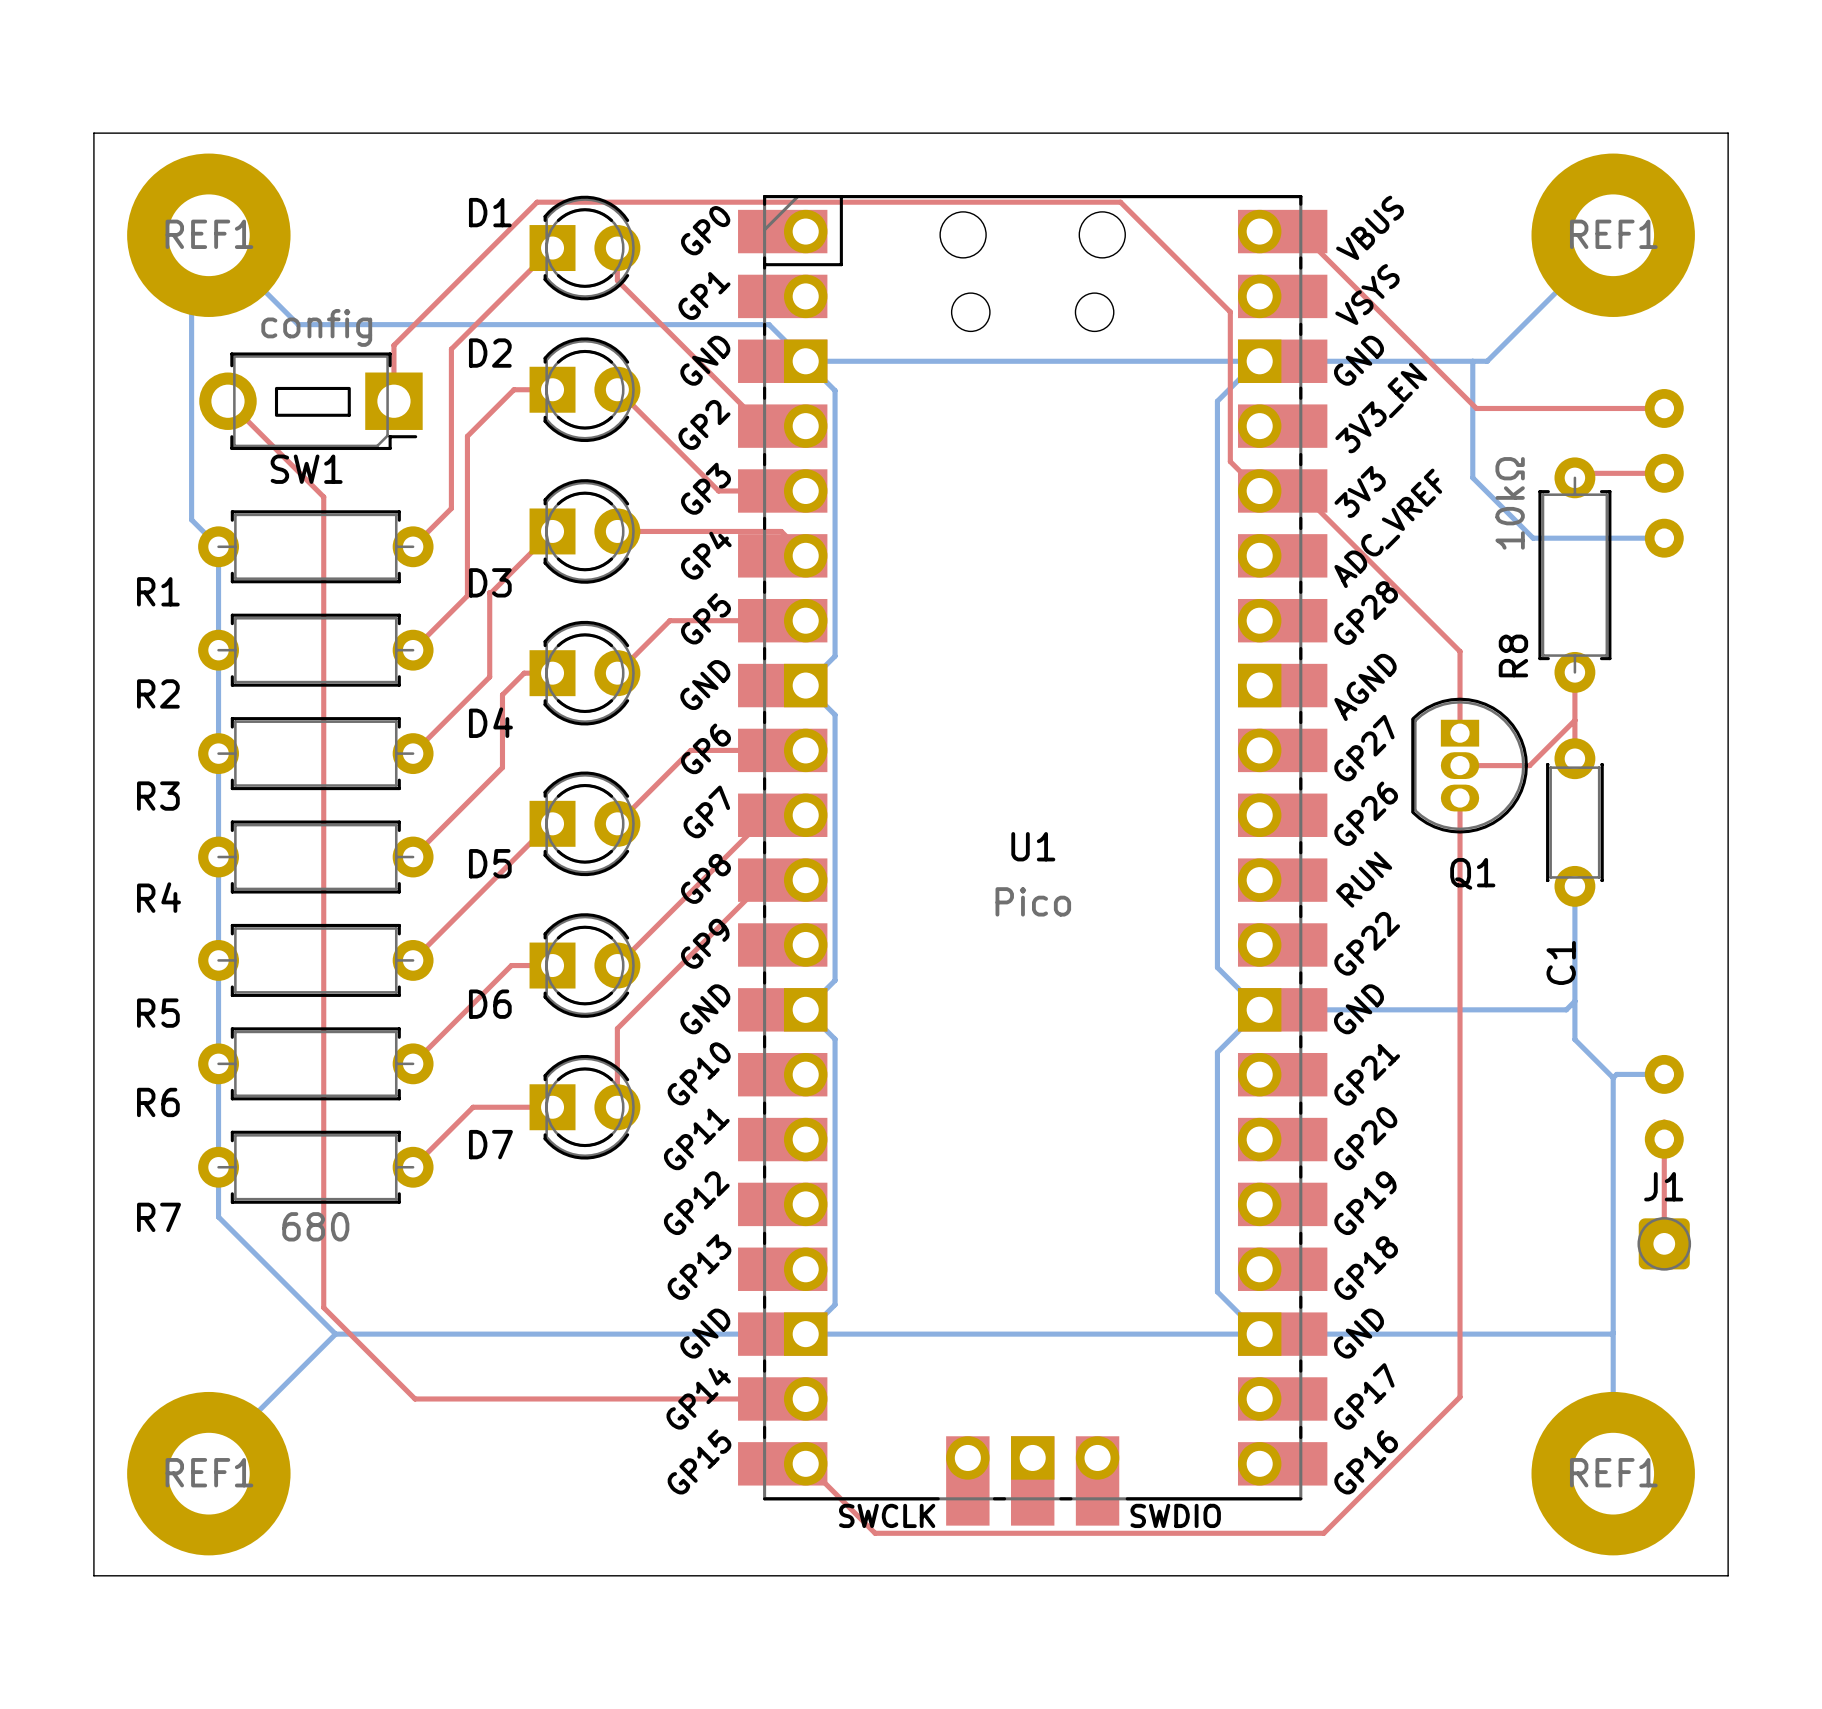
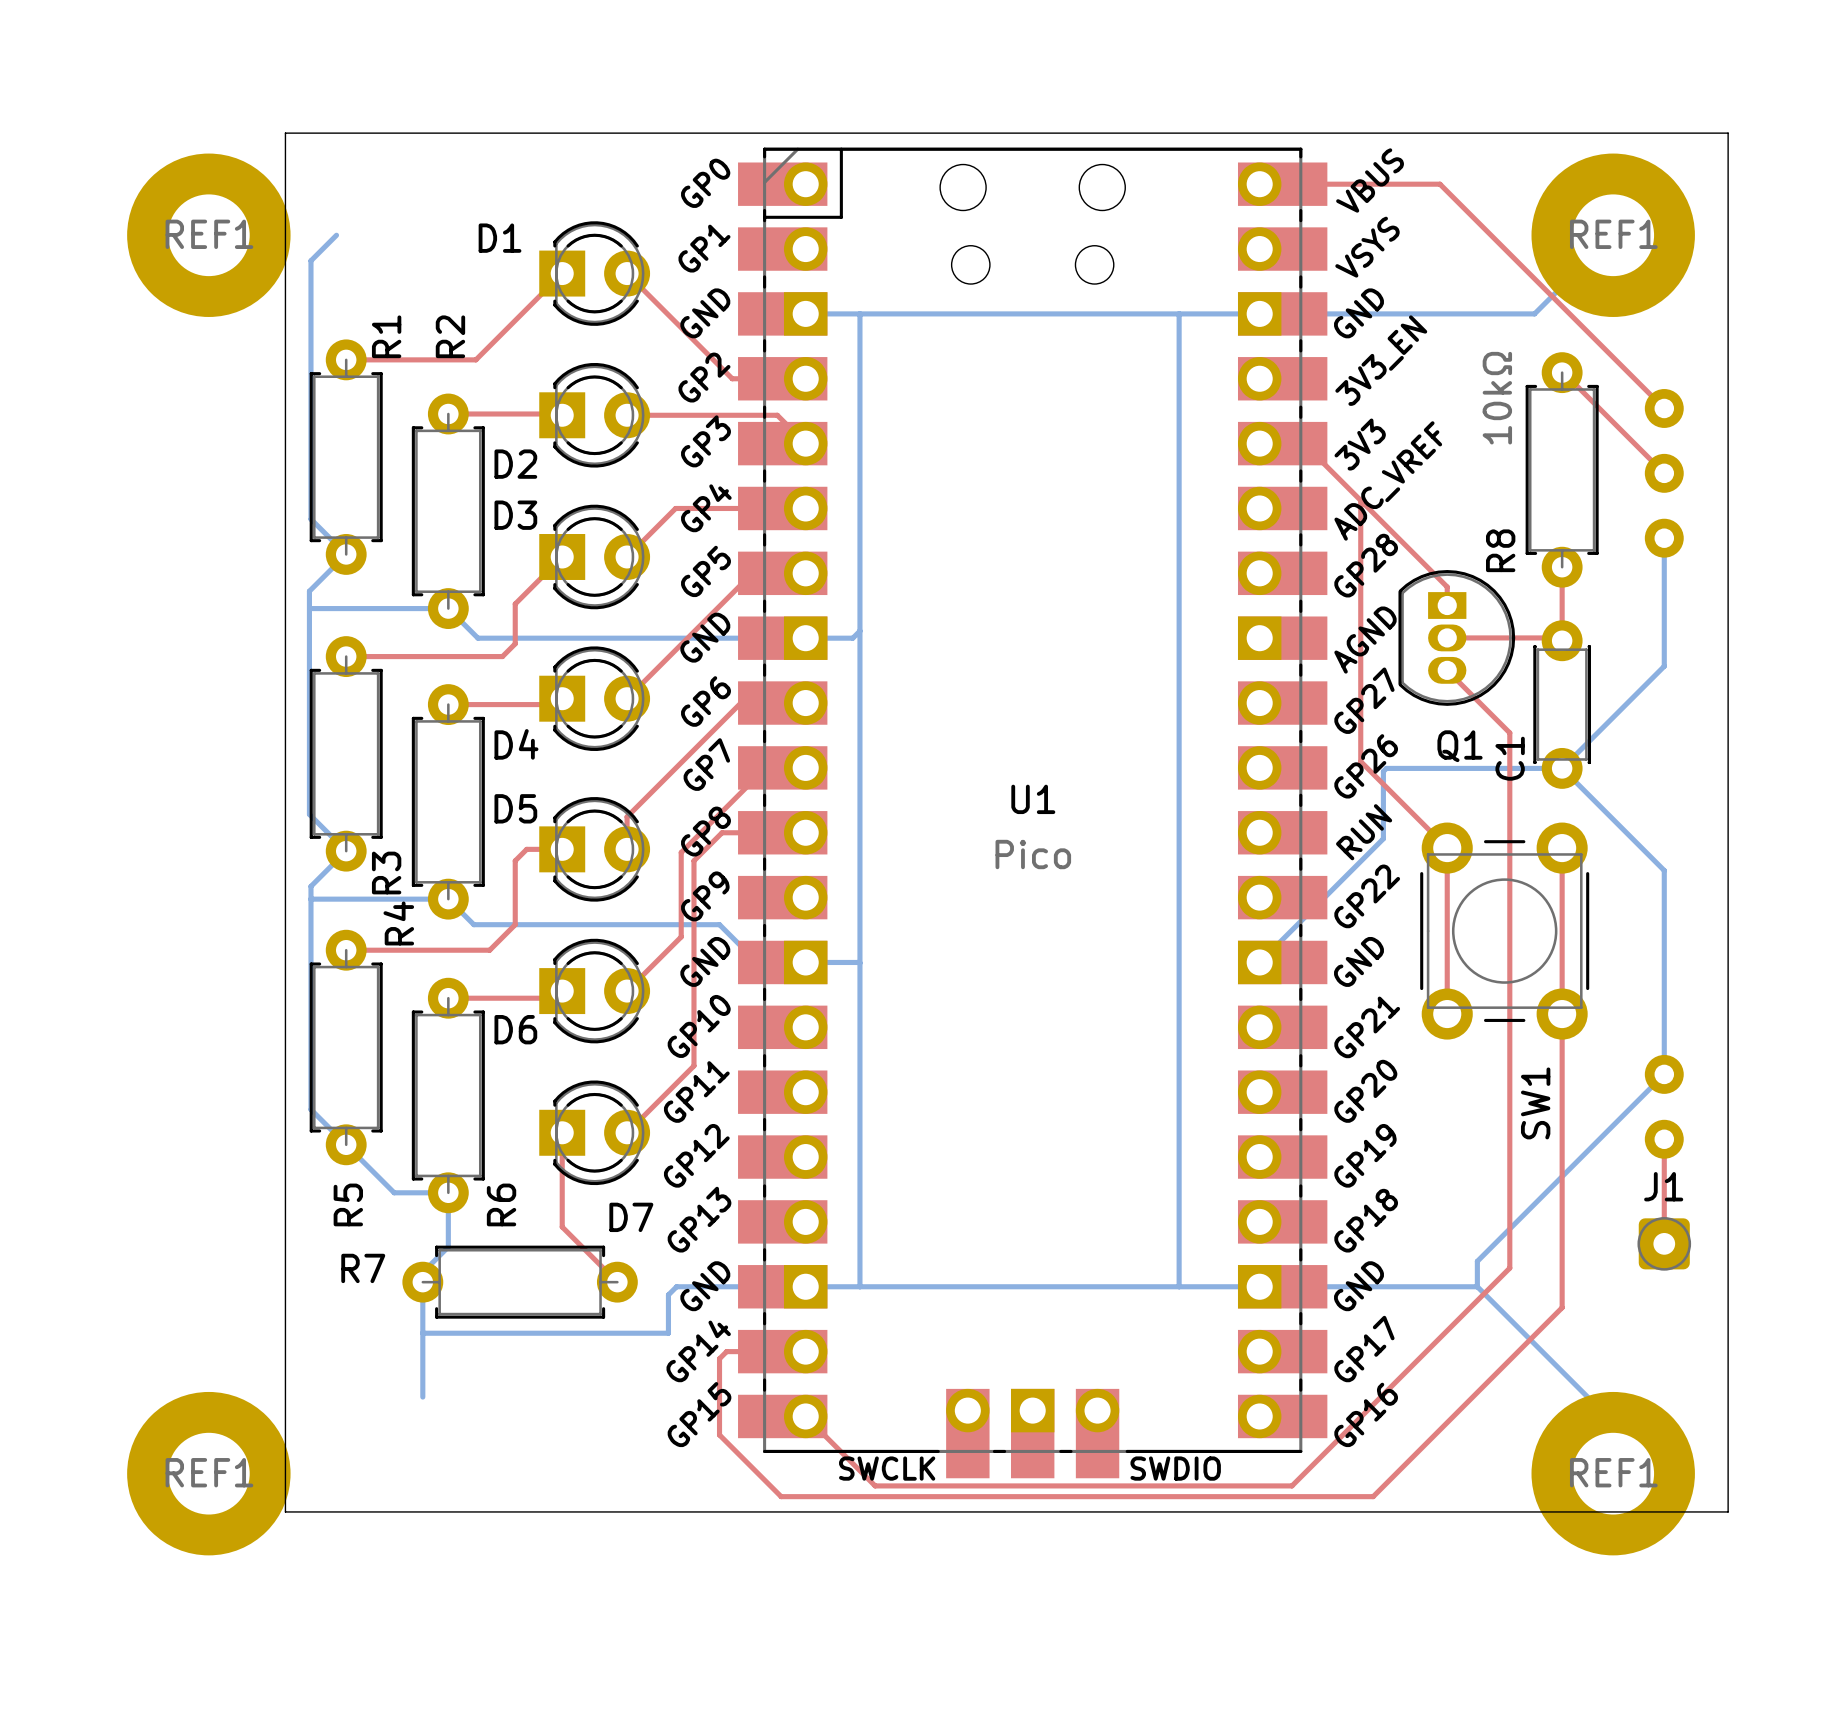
board edge: (285, 133) (93, 133) (93, 1575) (1728, 1575) (1728, 1511) -> (285, 133) (285, 1511) (1728, 1511)
top track: (1299, 231) (1476, 408) (1664, 408) -> (1259, 184) (1439, 184) (1664, 408)
bottom track: (208, 235) (298, 324) (769, 324) (835, 390) (835, 656) (805, 685) (835, 714) (835, 980) (805, 1009) (835, 1039) (835, 1304) (805, 1334) -> none
bottom track: none -> (336, 235) (310, 260) (310, 519) (346, 554) (309, 591) (309, 814) (346, 851) (310, 886) (310, 1109) (394, 1192) (448, 1192) (448, 1246) (422, 1272)
top track: (552, 248) (451, 349) (451, 508) (413, 546) -> none
D1 position: (584, 248) -> (594, 273)
top track: (617, 248) (617, 280) (762, 426) -> none
bottom track: (191, 252) (191, 519) (218, 546) (218, 1217) (335, 1334) -> none
top track: none -> (562, 273) (475, 359) (346, 359)
top track: none -> (627, 273) (732, 378) (805, 378)
bottom track: none -> (859, 313) (859, 1286)
bottom track: none -> (1179, 313) (1179, 1286)
bottom track: (1534, 313) (1487, 361) (805, 361) -> (1534, 313) (805, 313)
SW1 value: config (316, 327) -> none
SW1 footprint: [199, 352, 423, 451] -> [1420, 822, 1590, 1040]
D2 name position: D2 (490, 353) -> D2 (515, 464)
bottom track: (1257, 361) (1217, 401) (1217, 967) (1259, 1009) (1566, 1009) (1574, 1001) -> none
bottom track: (1472, 361) (1472, 477) (1533, 538) (1664, 538) -> (1562, 768) (1664, 666) (1664, 538)
top track: (552, 389) (513, 389) (467, 436) (467, 595) (413, 650) -> none
D2 position: (584, 389) -> (594, 415)
top track: (617, 389) (718, 490) (805, 490) -> none
top track: (227, 401) (323, 496) (323, 1307) (415, 1398) (805, 1398) -> none
top track: (393, 401) (393, 345) (537, 202) (1120, 202) (1230, 311) (1230, 461) (1259, 490) -> none
top track: none -> (448, 414) (560, 414)
top track: none -> (627, 415) (777, 415) (805, 443)
top track: none -> (1303, 443) (1447, 586) (1447, 605)
SW1 name position: SW1 (306, 469) -> SW1 (1535, 1103)
top track: (1579, 473) (1664, 473) -> (1563, 372) (1664, 473)
top track: (1299, 490) (1460, 651) (1460, 733) -> none
top track: none -> (1360, 500) (1360, 761) (1447, 848) (1447, 1014)
top track: none -> (805, 508) (675, 508) (627, 556)
top track: (552, 531) (489, 592) (489, 677) (413, 753) -> none
D3 position: (584, 531) -> (594, 556)
top track: (617, 531) (781, 531) (805, 555) -> none
R1 rotation: 0° (315, 546) -> 90° clockwise (346, 457)
top track: none -> (562, 556) (515, 603) (515, 643) (502, 656) (346, 656)
top track: none -> (1562, 567) (1562, 640)
top track: none -> (752, 573) (627, 698)
R8 position: (1574, 575) -> (1562, 469)
D3 name position: D3 (490, 582) -> D3 (515, 515)
R1 name position: R1 (158, 591) -> R1 (386, 336)
bottom track: none -> (310, 608) (448, 608) (477, 638) (852, 638) (859, 631)
top track: (805, 620) (669, 620) (617, 673) -> none
top track: none -> (1447, 637) (1549, 637)
R2 rotation: 0° (315, 650) -> 90° clockwise (448, 511)
R2 position: (315, 650) -> (448, 511)
top track: none -> (1447, 670) (1509, 732) (1509, 1268) (1291, 1485) (875, 1485) (805, 1416)
top track: (1574, 672) (1574, 758) -> none
top track: (552, 673) (524, 673) (502, 694) (502, 767) (413, 857) -> none
D4 position: (584, 673) -> (594, 698)
top track: none -> (740, 703) (627, 816) (627, 849)
top track: none -> (448, 704) (556, 704)
top track: (1574, 720) (1529, 765) (1460, 765) -> none
D4 name position: D4 (490, 722) -> D4 (516, 744)
top track: (805, 750) (690, 750) (617, 823) -> none
R3 rotation: 0° (315, 753) -> 90° clockwise (346, 753)
Q1 position: (1469, 765) -> (1456, 637)
top track: none -> (765, 767) (681, 852) (681, 936) (627, 991)
bottom track: none -> (1562, 768) (1664, 870) (1664, 1074) (1477, 1261) (1477, 1286)
bottom track: none -> (1562, 768) (1386, 768) (1383, 771) (1383, 838) (1259, 962)
R3 name position: R3 (158, 796) -> R3 (386, 873)
top track: (1460, 798) (1460, 1397) (1323, 1533) (875, 1533) (805, 1463) -> none
top track: (767, 815) (617, 965) -> none
C1 position: (1574, 822) -> (1562, 704)
top track: (549, 823) (413, 960) -> none
D5 position: (584, 823) -> (594, 849)
top track: none -> (805, 832) (722, 832) (693, 860) (693, 1065) (627, 1132)
top track: none -> (1562, 848) (1562, 1307) (1373, 1496) (781, 1496) (719, 1434) (719, 1358) (726, 1351) (805, 1351)
top track: none -> (562, 849) (526, 849) (515, 860) (515, 924) (489, 950) (346, 950)
R4 rotation: 0° (315, 857) -> 90° clockwise (448, 801)
R4 position: (315, 857) -> (448, 801)
U1 position: (1032, 860) -> (1032, 812)
D5 name position: D5 (490, 863) -> D5 (515, 808)
top track: (765, 880) (617, 1028) (617, 1107) -> none
bottom track: (1574, 886) (1574, 1039) (1613, 1077) -> none
R4 name position: R4 (158, 897) -> R4 (398, 923)
bottom track: none -> (310, 899) (448, 899) (473, 924) (719, 924) (757, 962) (859, 962)
R5 rotation: 0° (315, 960) -> 90° clockwise (346, 1047)
C1 name position: C1 (1561, 962) -> C1 (1510, 758)
top track: (552, 965) (511, 965) (413, 1063) -> none
D6 position: (584, 965) -> (594, 991)
top track: none -> (448, 998) (555, 998)
D6 name position: D6 (490, 1004) -> D6 (515, 1029)
bottom track: (1259, 1010) (1217, 1052) (1217, 1291) (1259, 1334) -> none
R5 name position: R5 (158, 1013) -> R5 (348, 1204)
R6 rotation: 0° (315, 1063) -> 90° clockwise (448, 1095)
bottom track: (1664, 1074) (1616, 1074) (1613, 1077) -> none
bottom track: (1613, 1077) (1613, 1473) -> none
R6 name position: R6 (158, 1102) -> R6 (501, 1204)
top track: (552, 1107) (473, 1107) (413, 1167) -> none
D7 position: (584, 1107) -> (594, 1132)
top track: none -> (562, 1132) (562, 1227) (617, 1282)
D7 name position: D7 (490, 1144) -> D7 (631, 1217)
R7 position: (315, 1167) -> (520, 1282)
R7 name position: R7 (158, 1217) -> R7 (363, 1268)
R7 value: 680 (315, 1226) -> none
bottom track: none -> (422, 1282) (422, 1397)
bottom track: none -> (1477, 1286) (1613, 1422)
bottom track: none -> (1477, 1286) (676, 1286) (668, 1294) (668, 1333) (422, 1333)
bottom track: (1613, 1333) (335, 1334) -> none
bottom track: (335, 1334) (196, 1473) -> none

